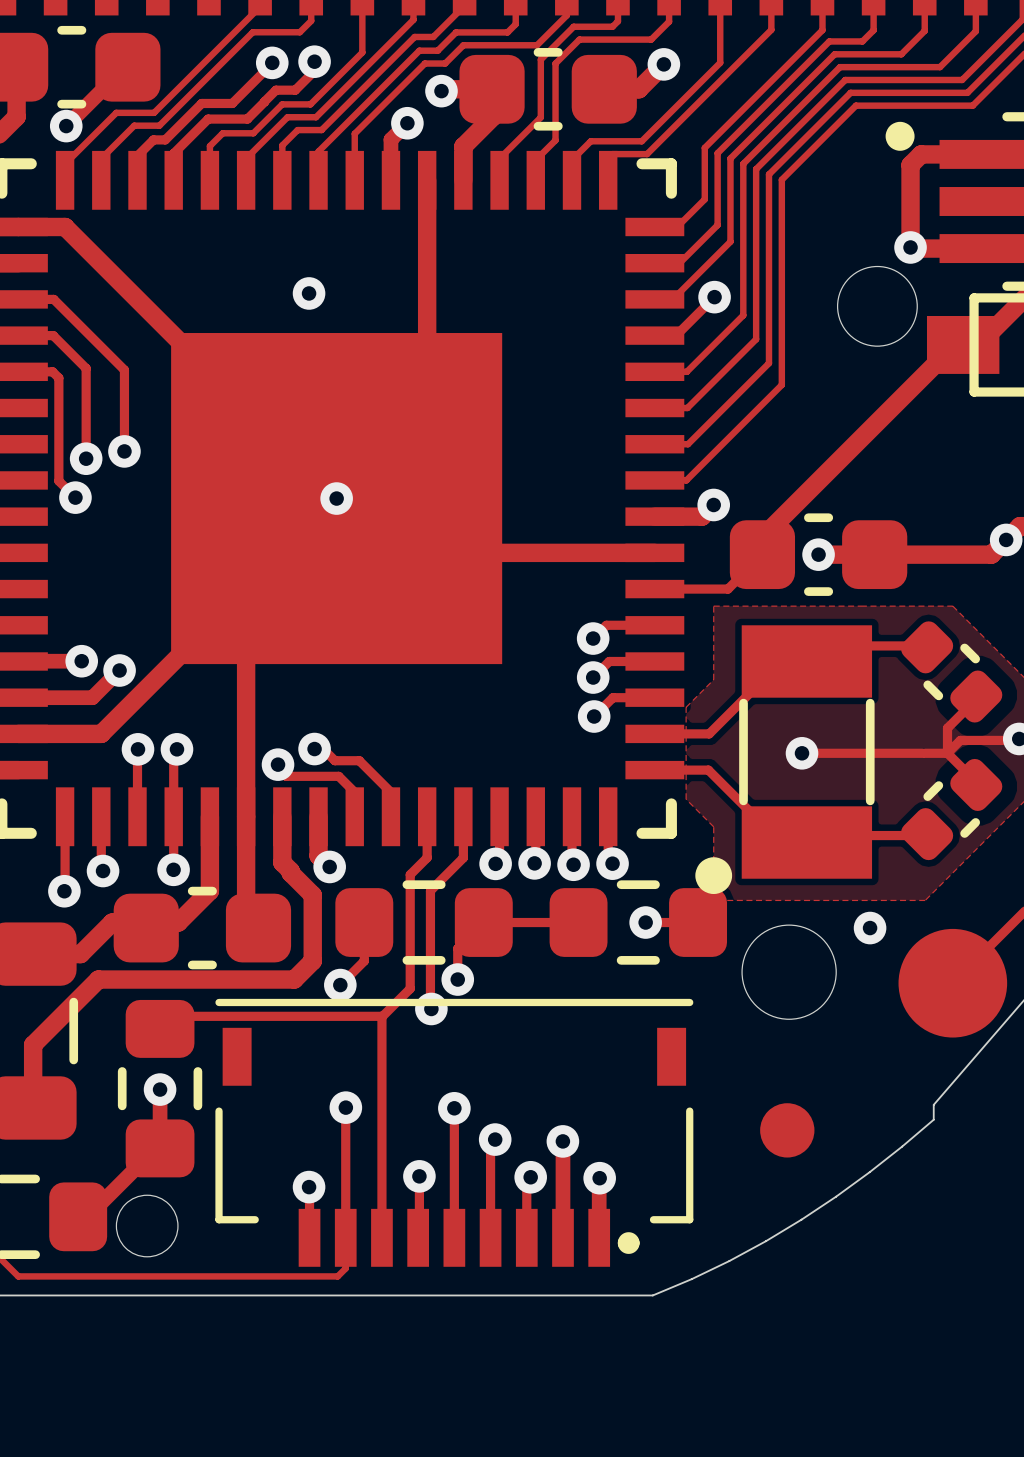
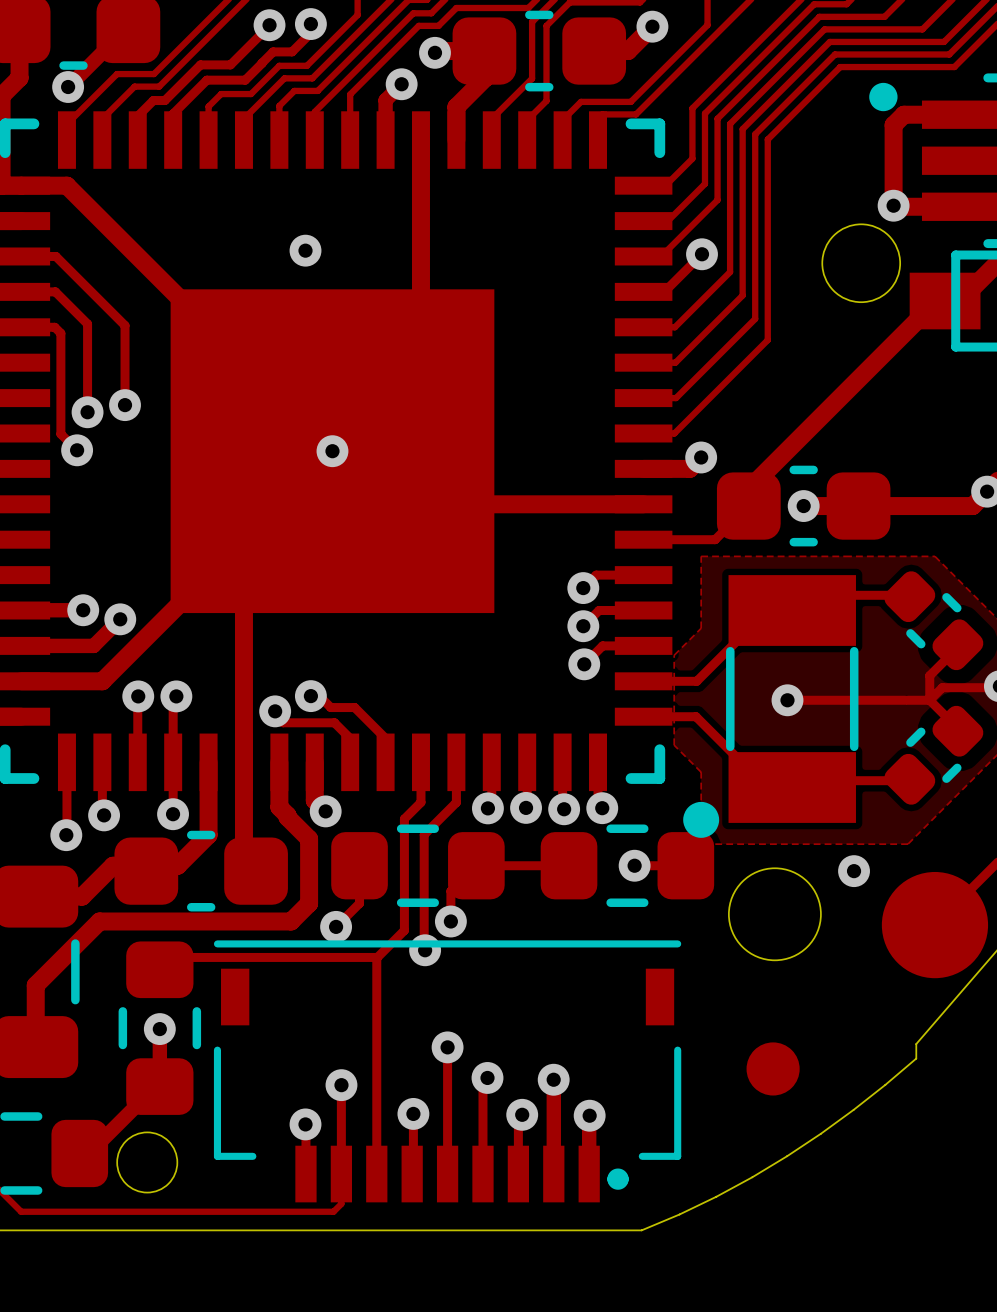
track: (345, 1107) (345, 1147) -> none
via position: (345, 1107) -> (341, 1085)

